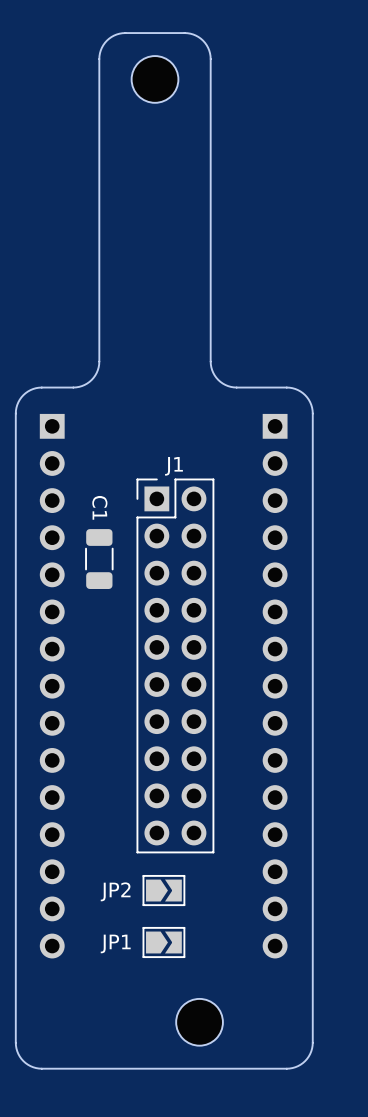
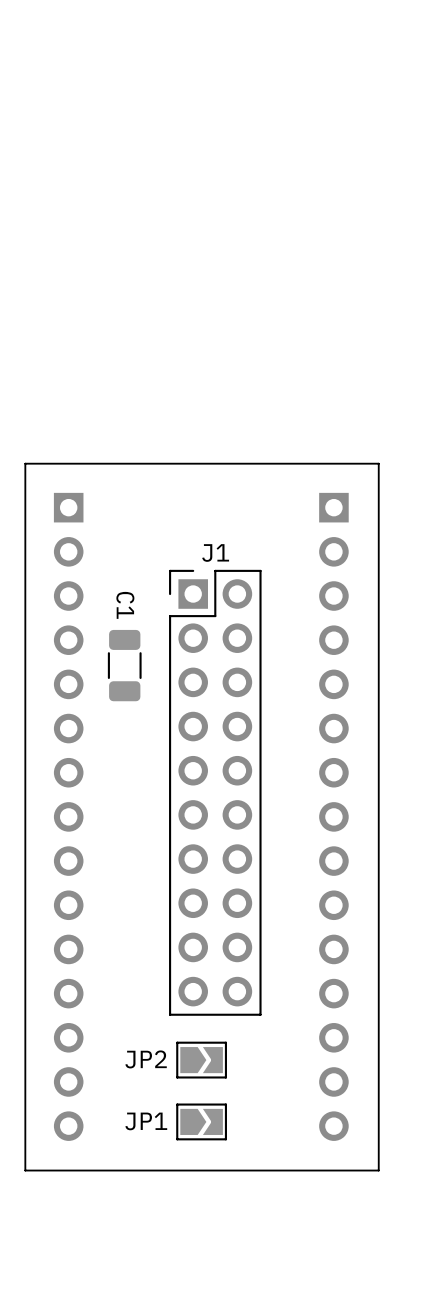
part: (155, 79) -> none
board edge: (312, 413) (308, 399) (298, 390) (286, 387) (230, 386) (218, 379) (212, 370) (210, 56) (206, 45) (200, 38) (184, 33) (119, 33) (109, 38) (101, 47) (99, 59) (98, 367) (91, 379) (81, 386) (38, 387) (27, 391) (19, 399) (15, 413) -> (378, 492) (378, 463) (25, 463) (25, 492)
board edge: (312, 983) (311, 1051) (300, 1064) (286, 1068) (33, 1067) (21, 1058) (16, 1048) (15, 983) -> (378, 1170) (25, 1170)
part: (199, 1022) -> none

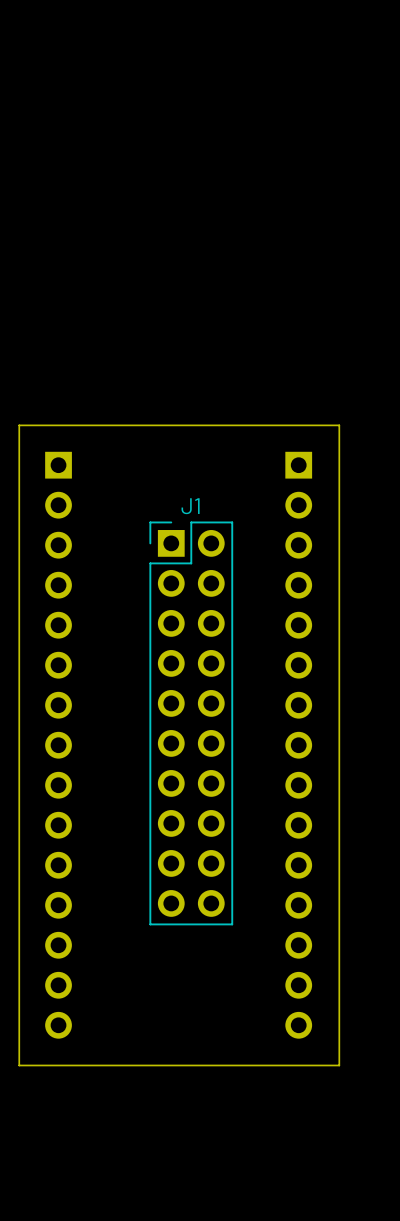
C1: (124, 665) -> none
JP2: (201, 1060) -> none
JP1: (201, 1121) -> none

